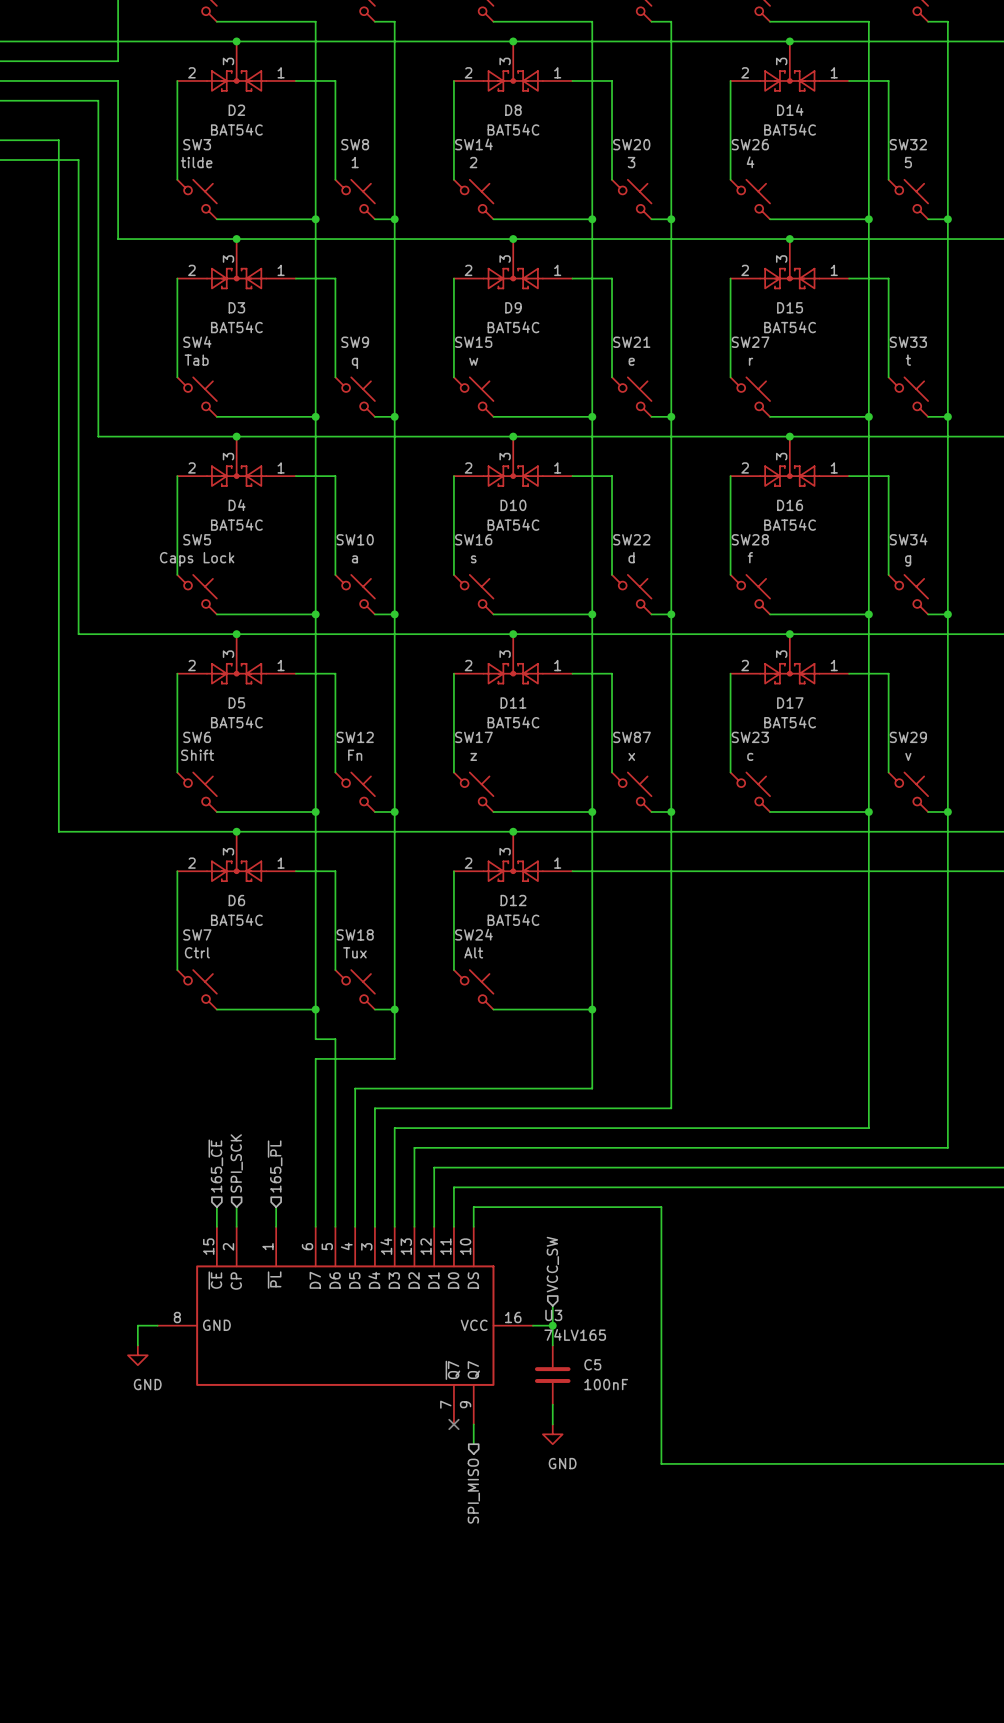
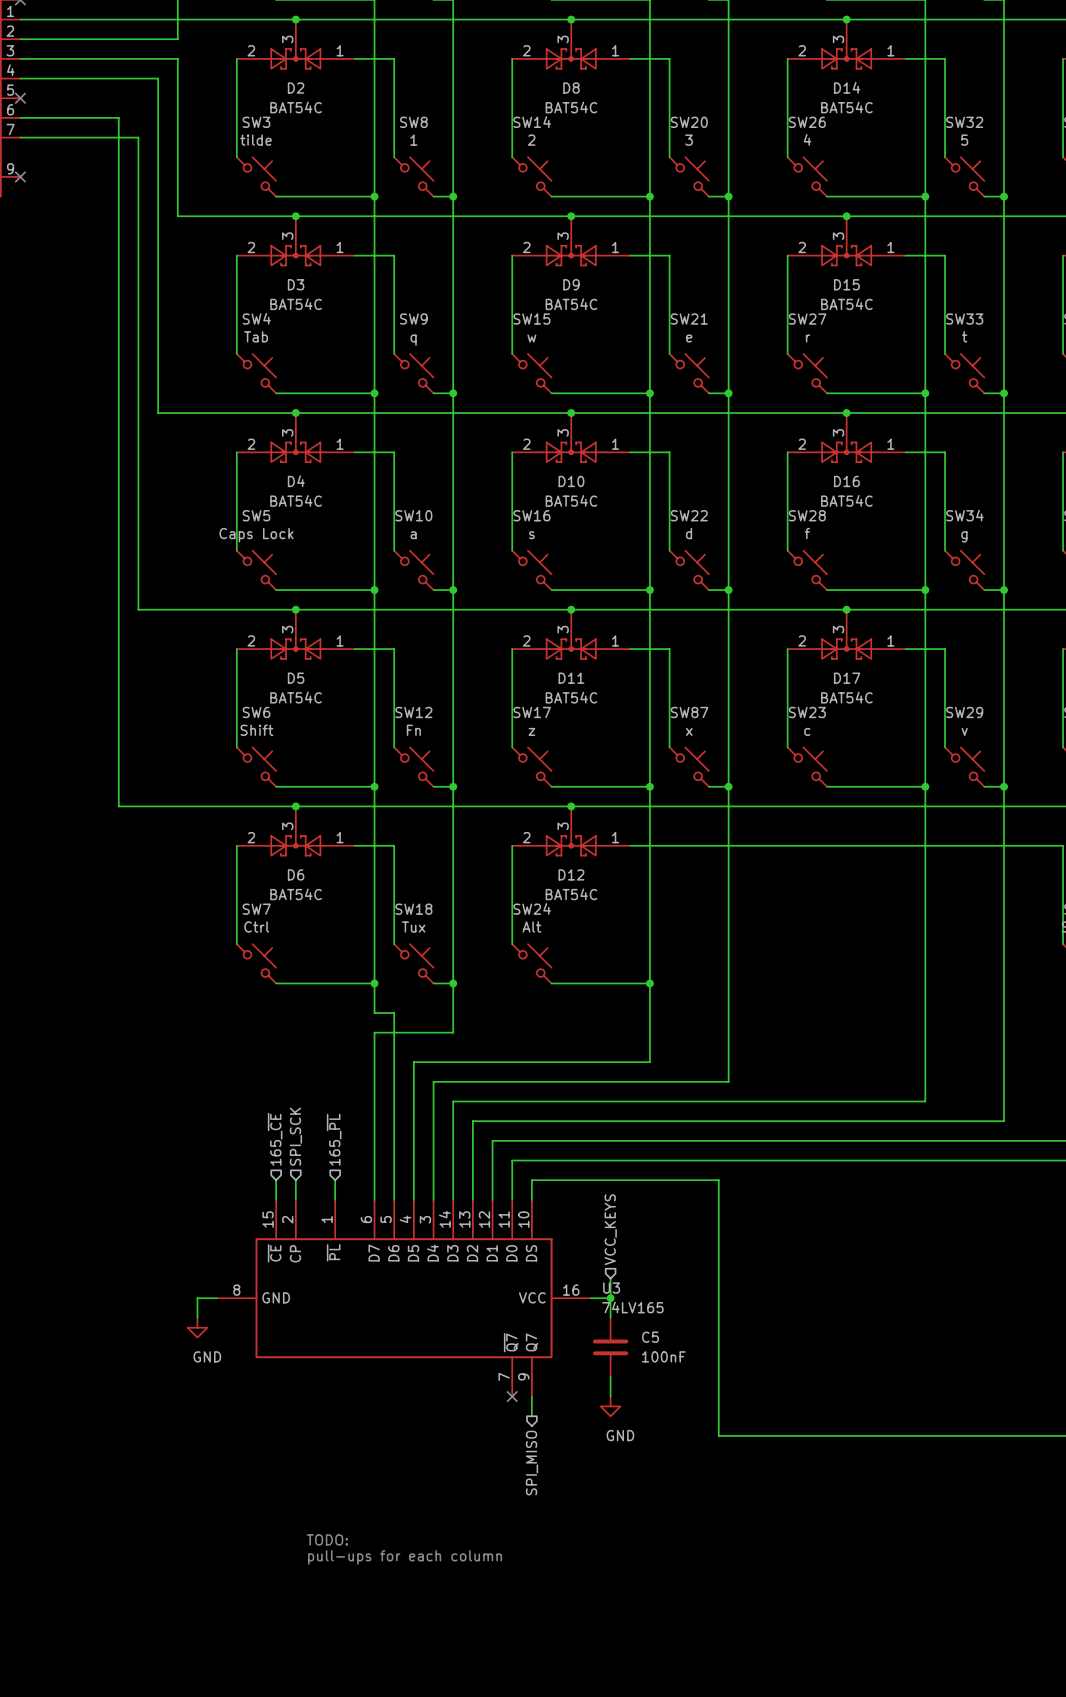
hierarchical label: VCC_SW (552, 1264) -> VCC_KEYS (610, 1229)
text: none -> TODO: (327, 1539)
text: none -> pull-ups for each column (405, 1557)

